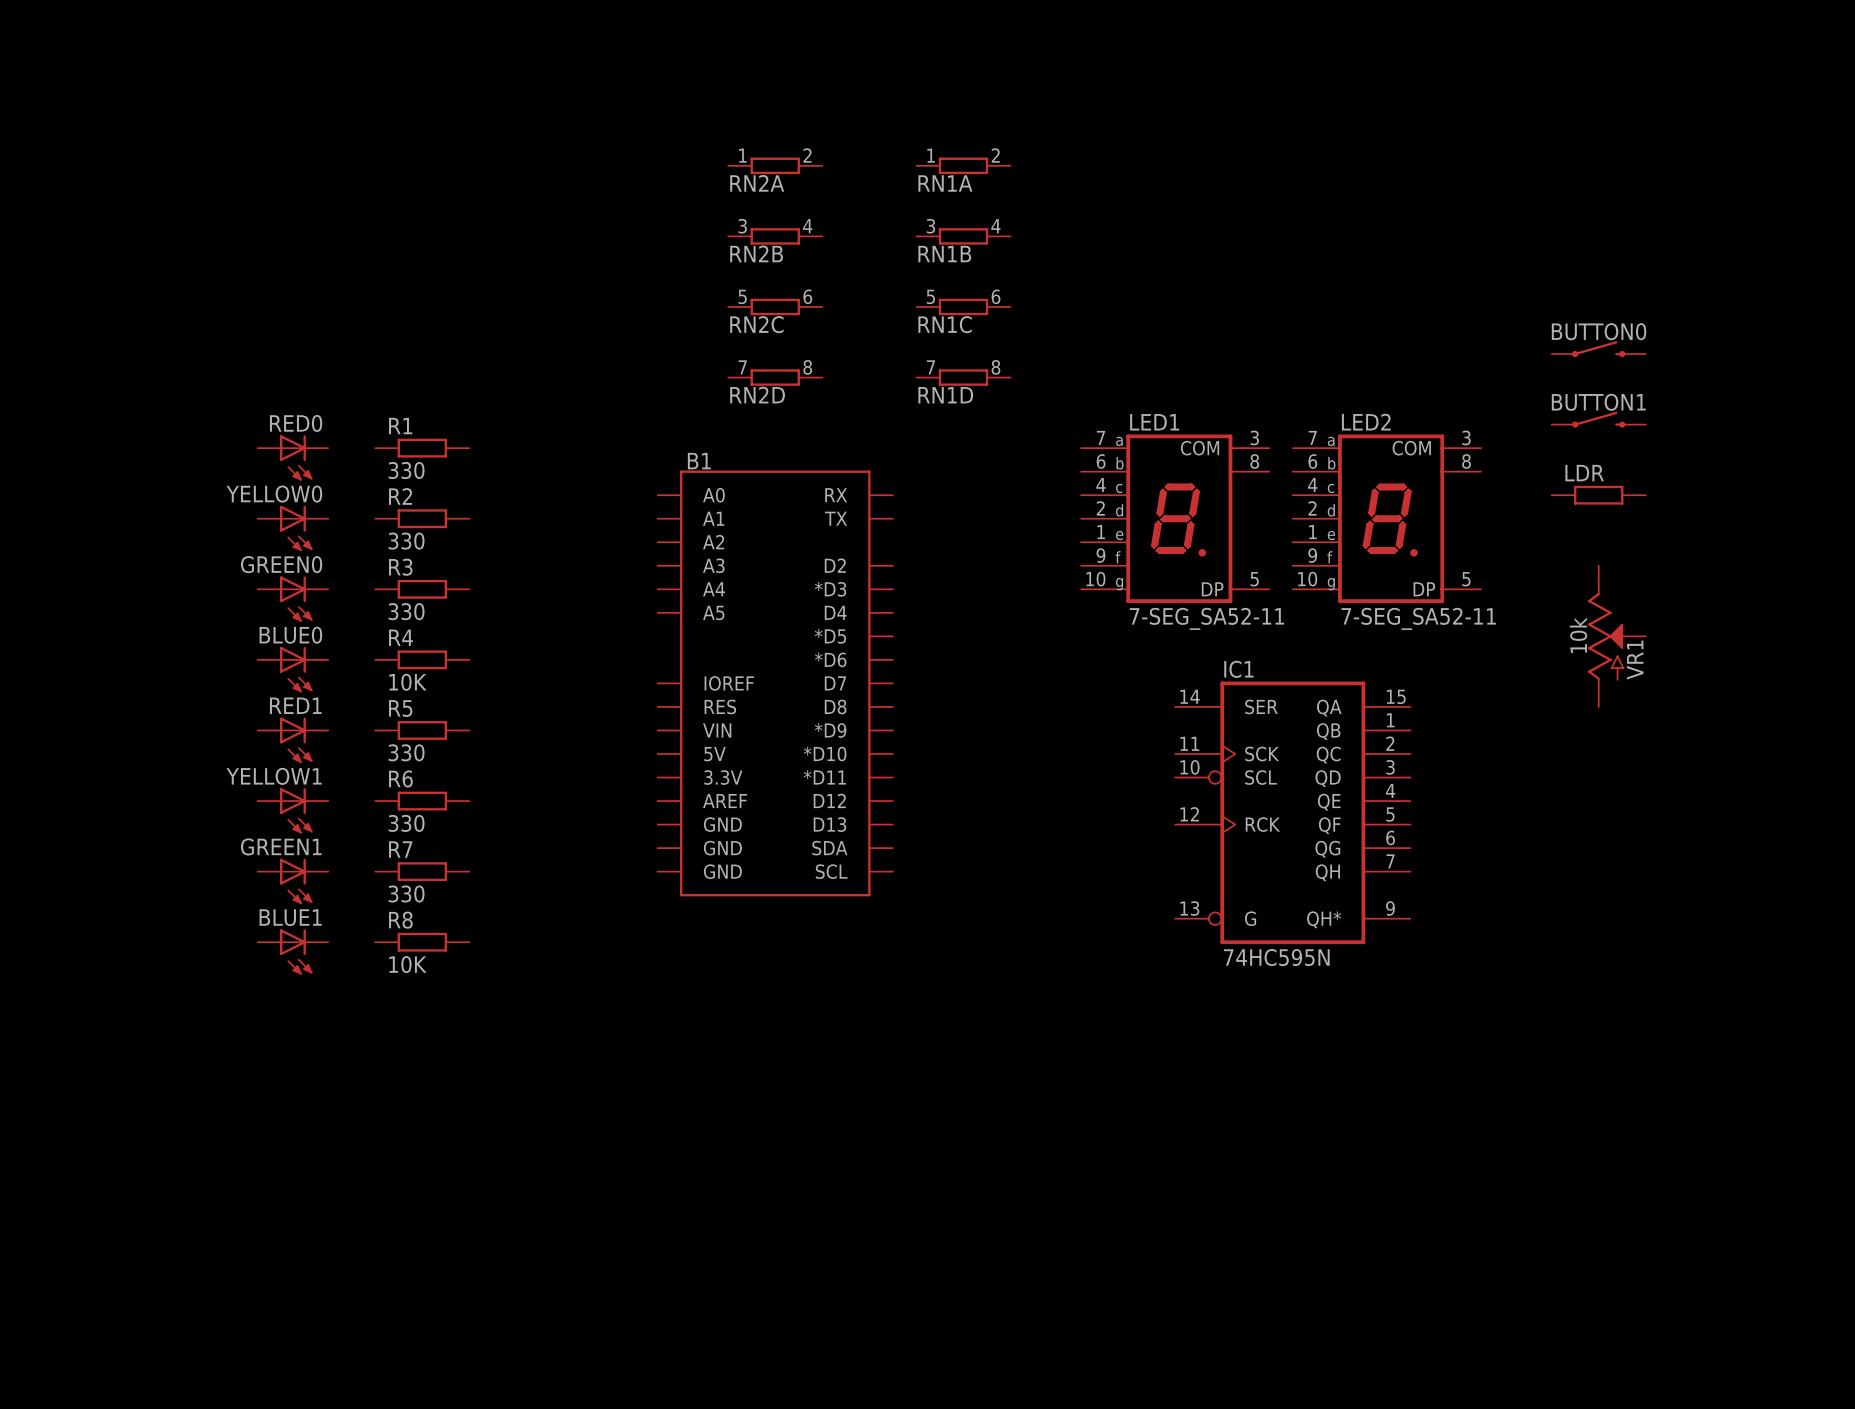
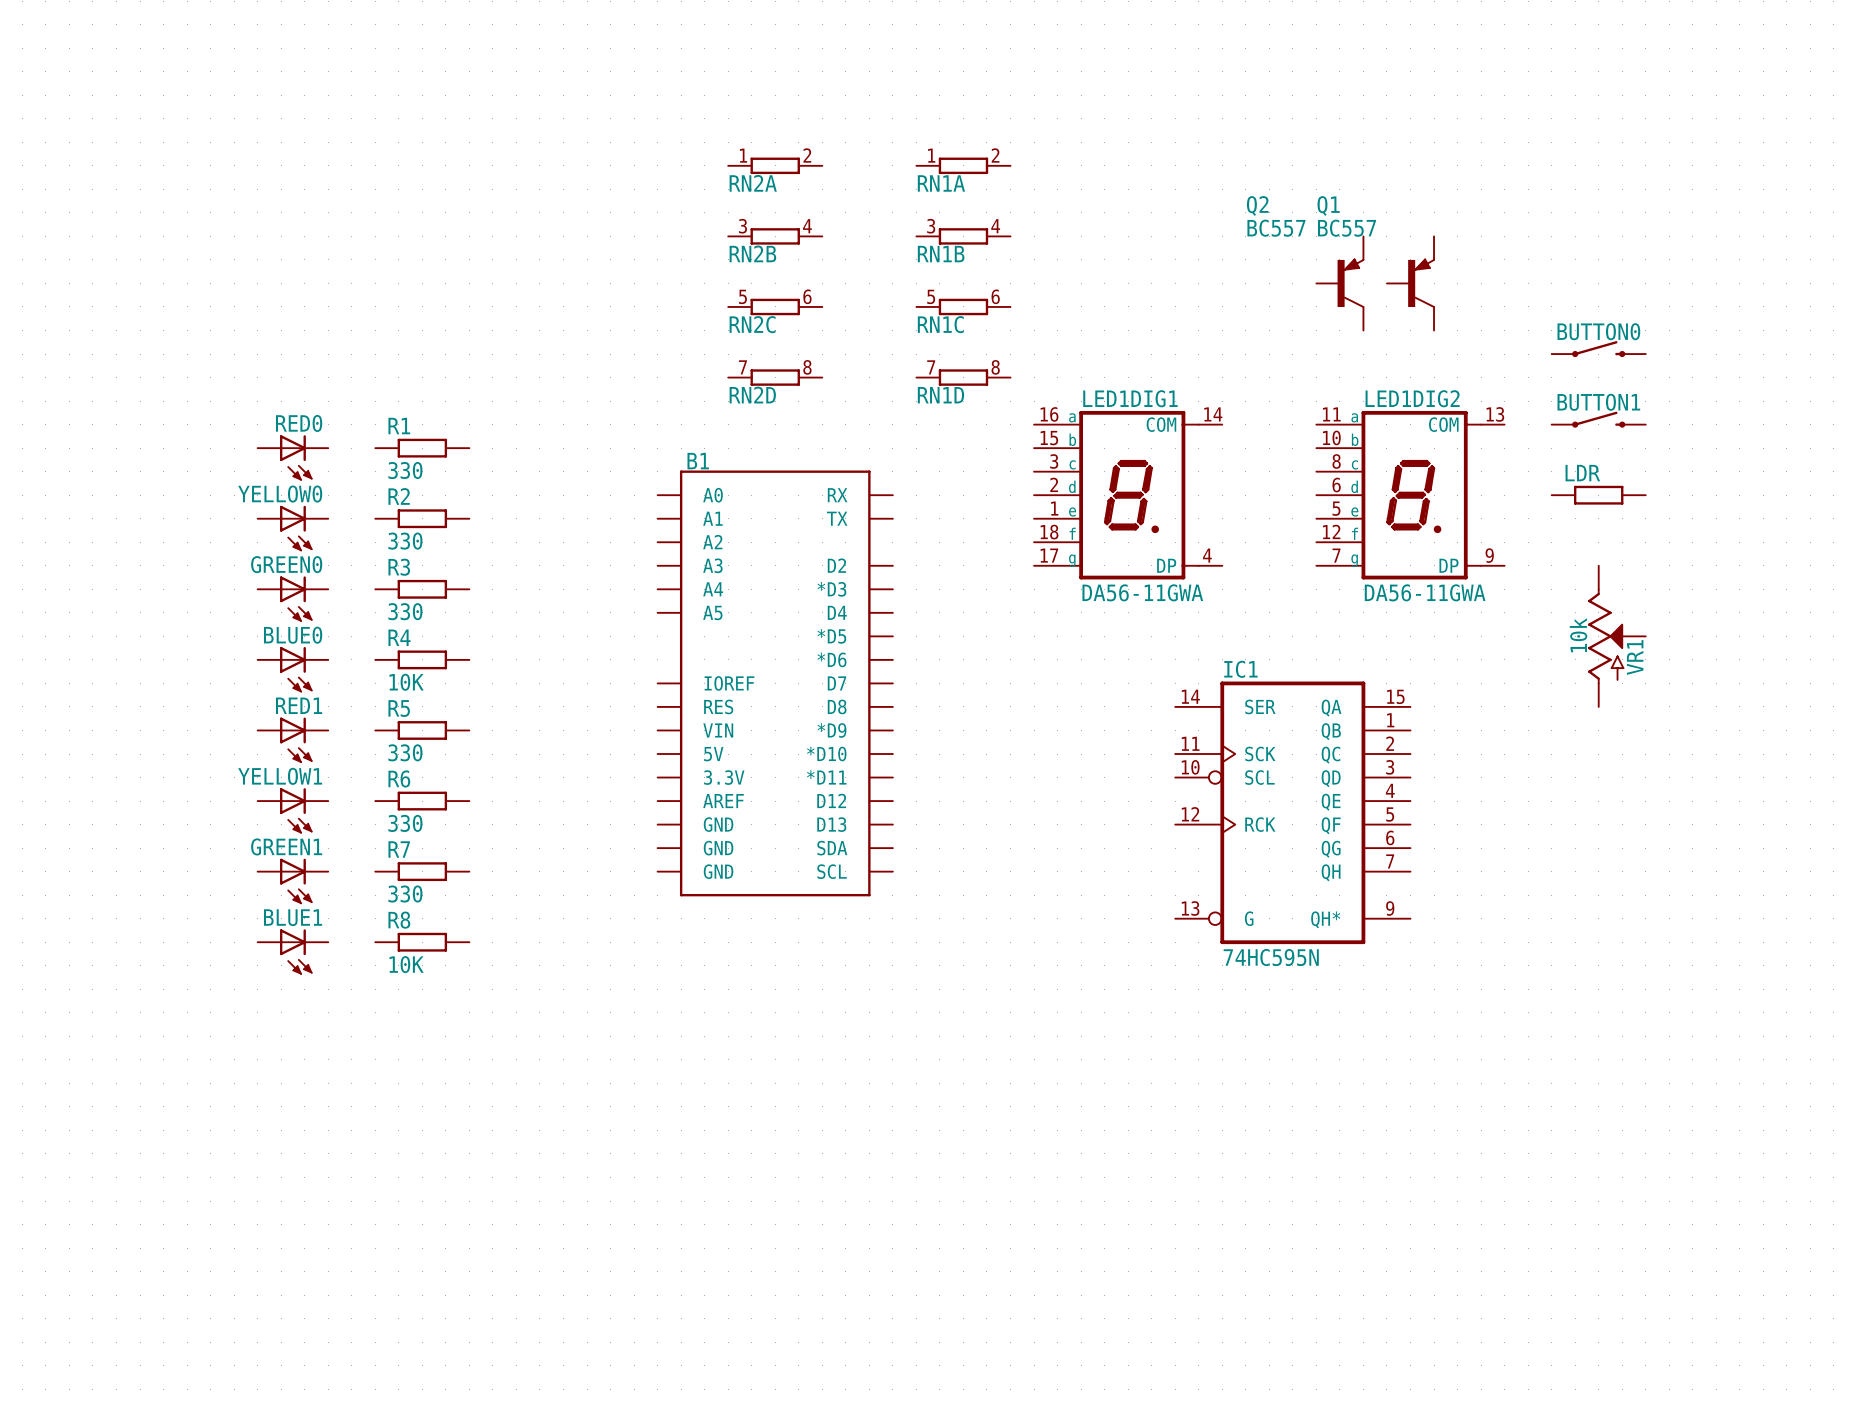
Q2: none -> BC557 (1340, 283)
Q1: none -> BC557 (1410, 283)
LED1DIG1: none -> DA56-11GWA (1128, 495)
LED1DIG2: none -> DA56-11GWA (1410, 495)
LED1: 7-SEG_SA52-11 (1175, 518) -> none
LED2: 7-SEG_SA52-11 (1386, 518) -> none

